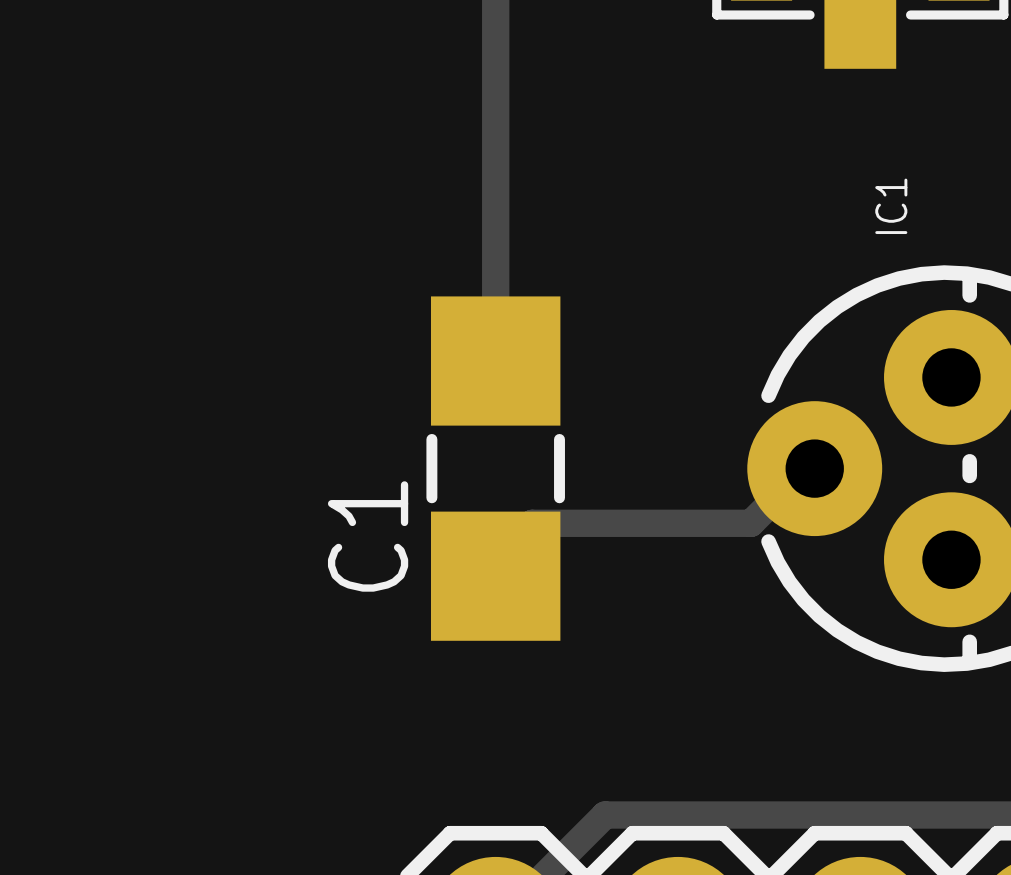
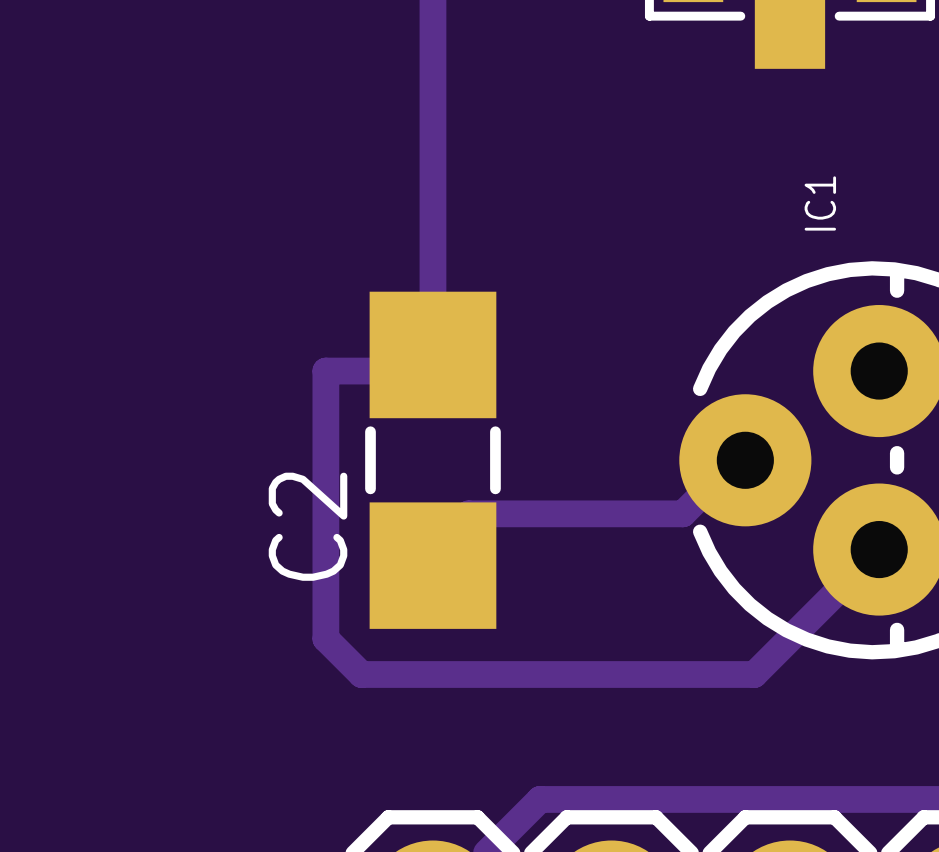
track: none -> (432, 354) (432, 371) (325, 371) (325, 638) (361, 674) (754, 674) (879, 549)
C1 name: C1 (368, 536) -> C2 (308, 526)

